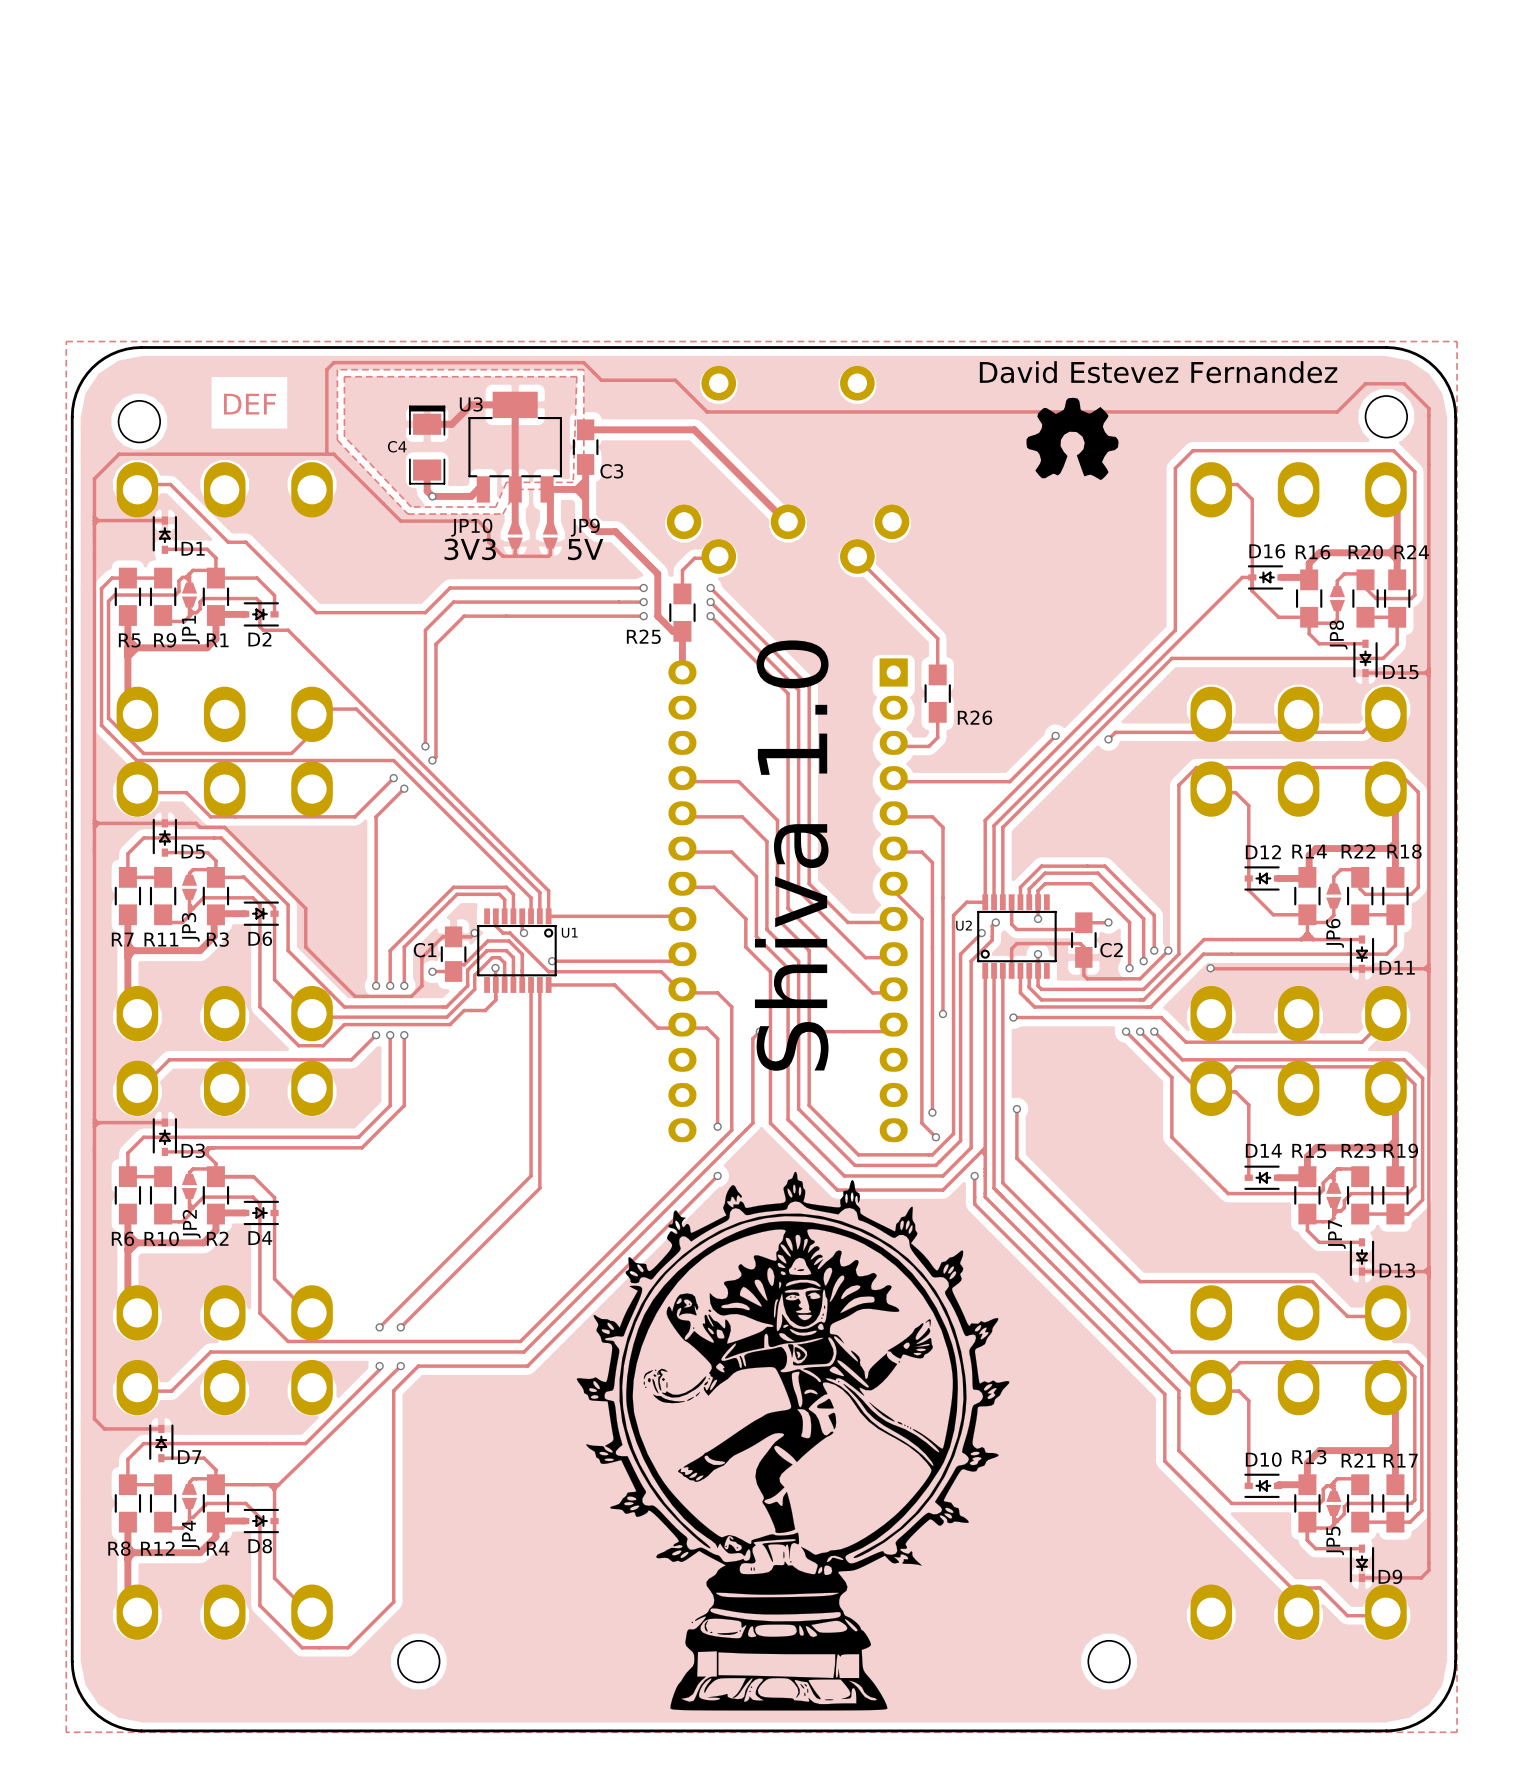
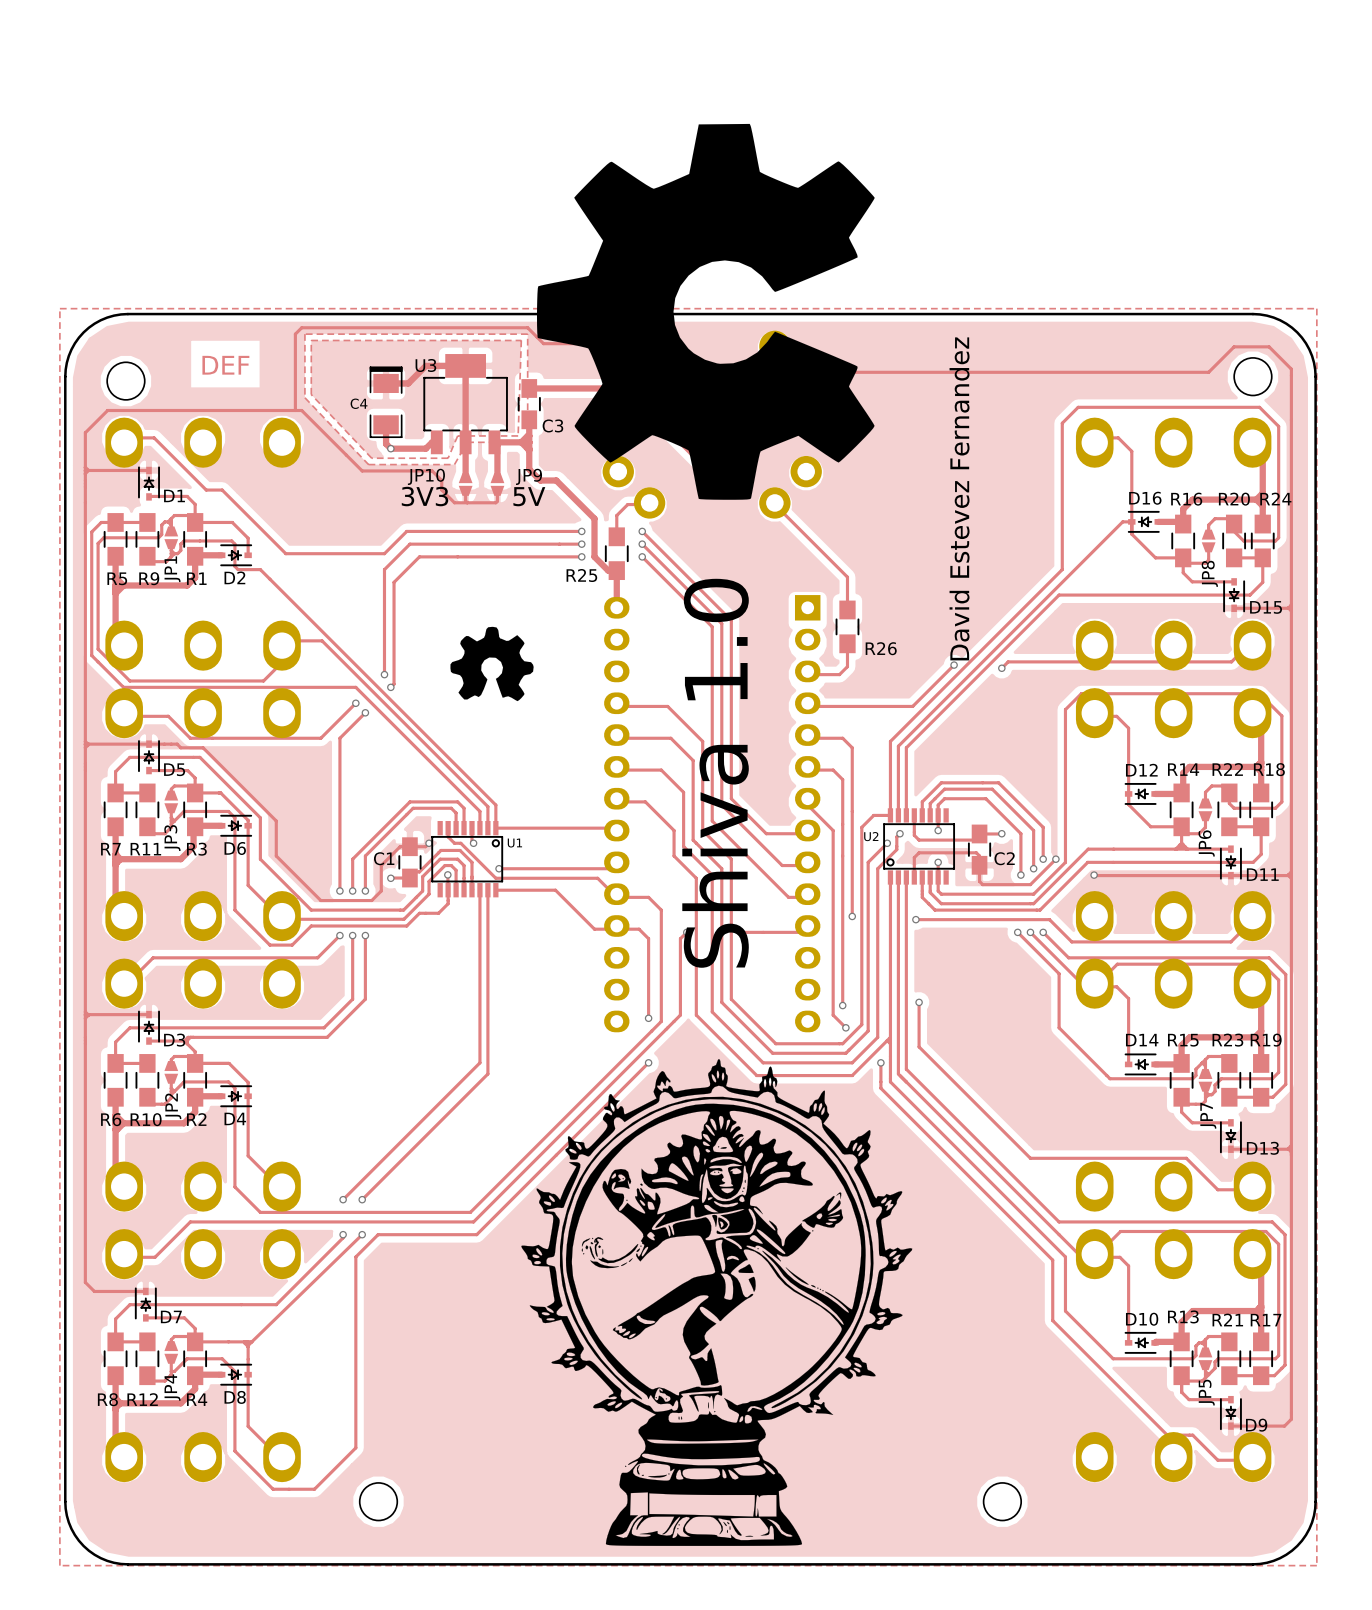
drawing: none -> [536, 123, 875, 500]
text rotation: 0° (1158, 372) -> 90° counterclockwise (959, 498)
drawing: [1026, 397, 1119, 481] -> none
drawing: none -> [450, 626, 534, 702]

